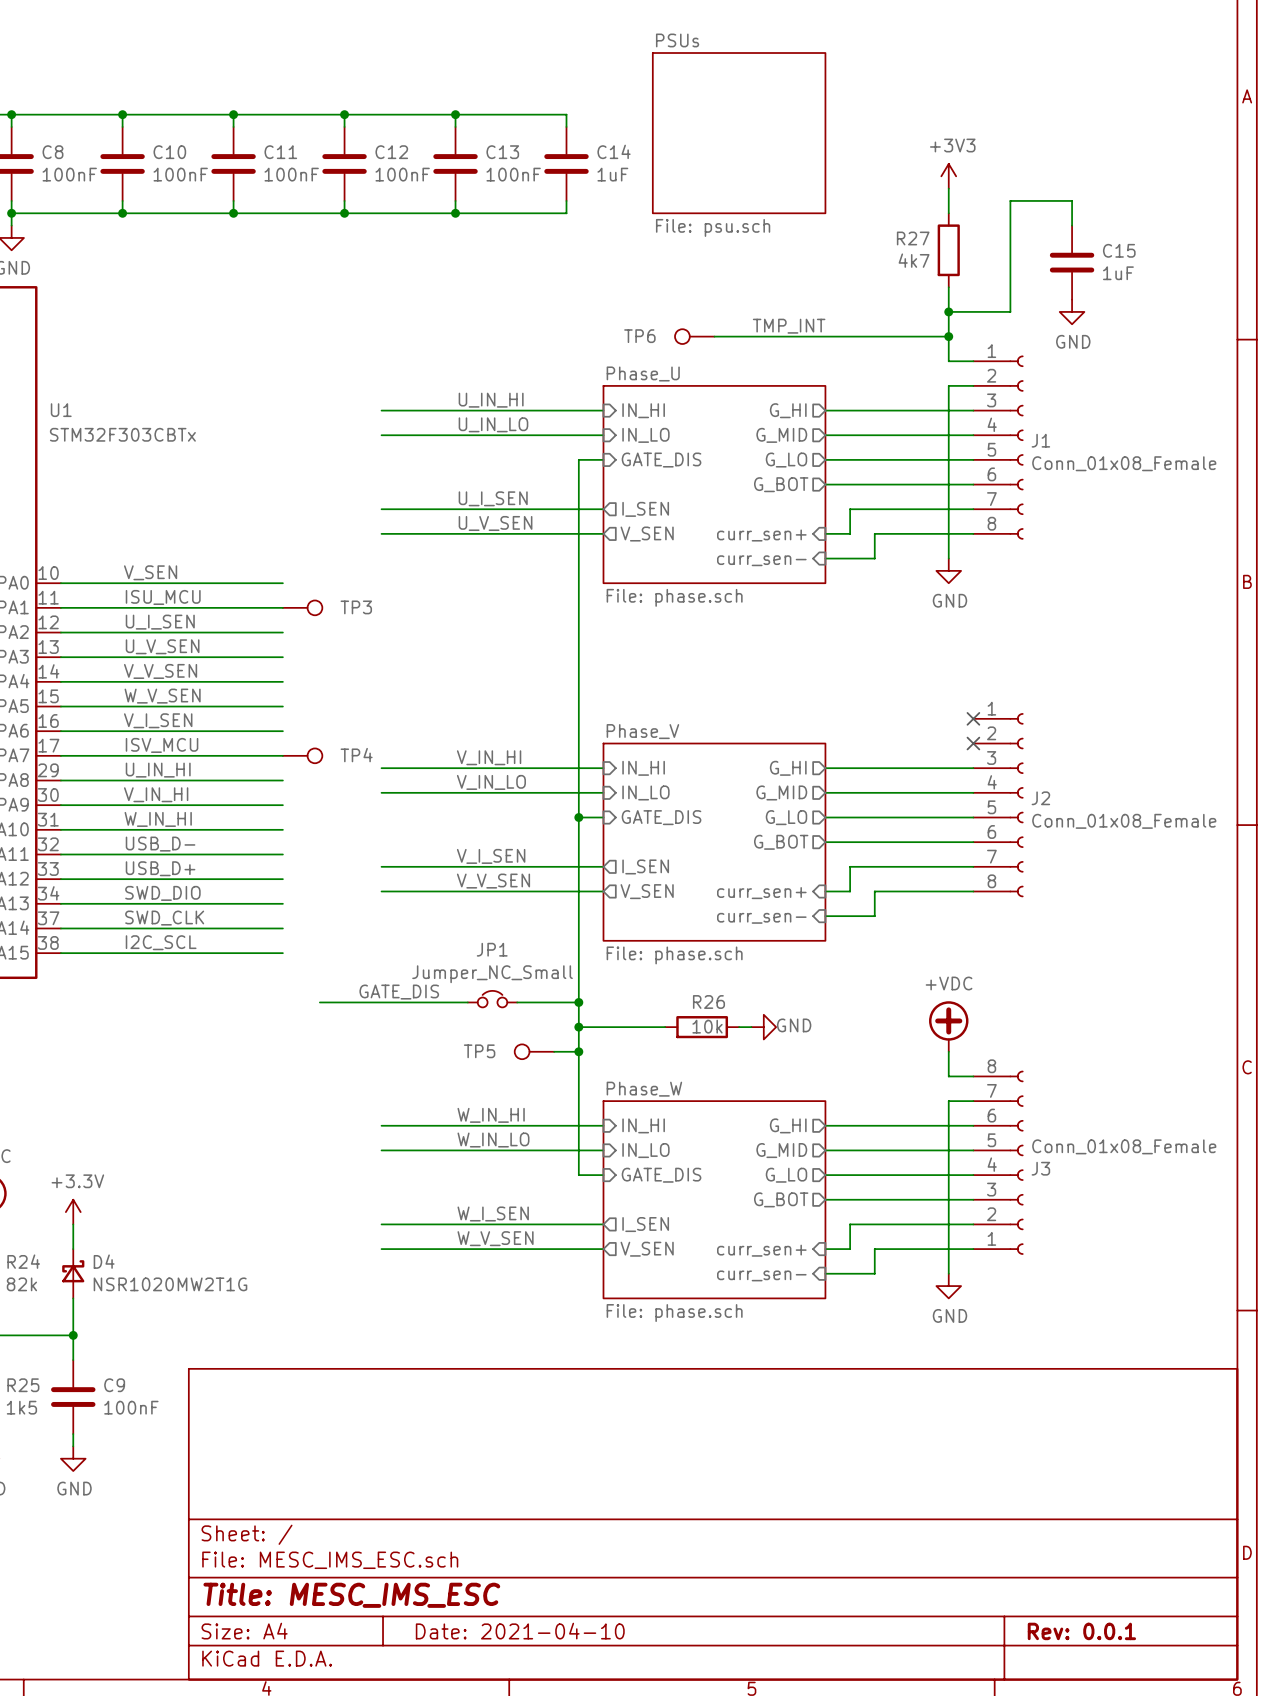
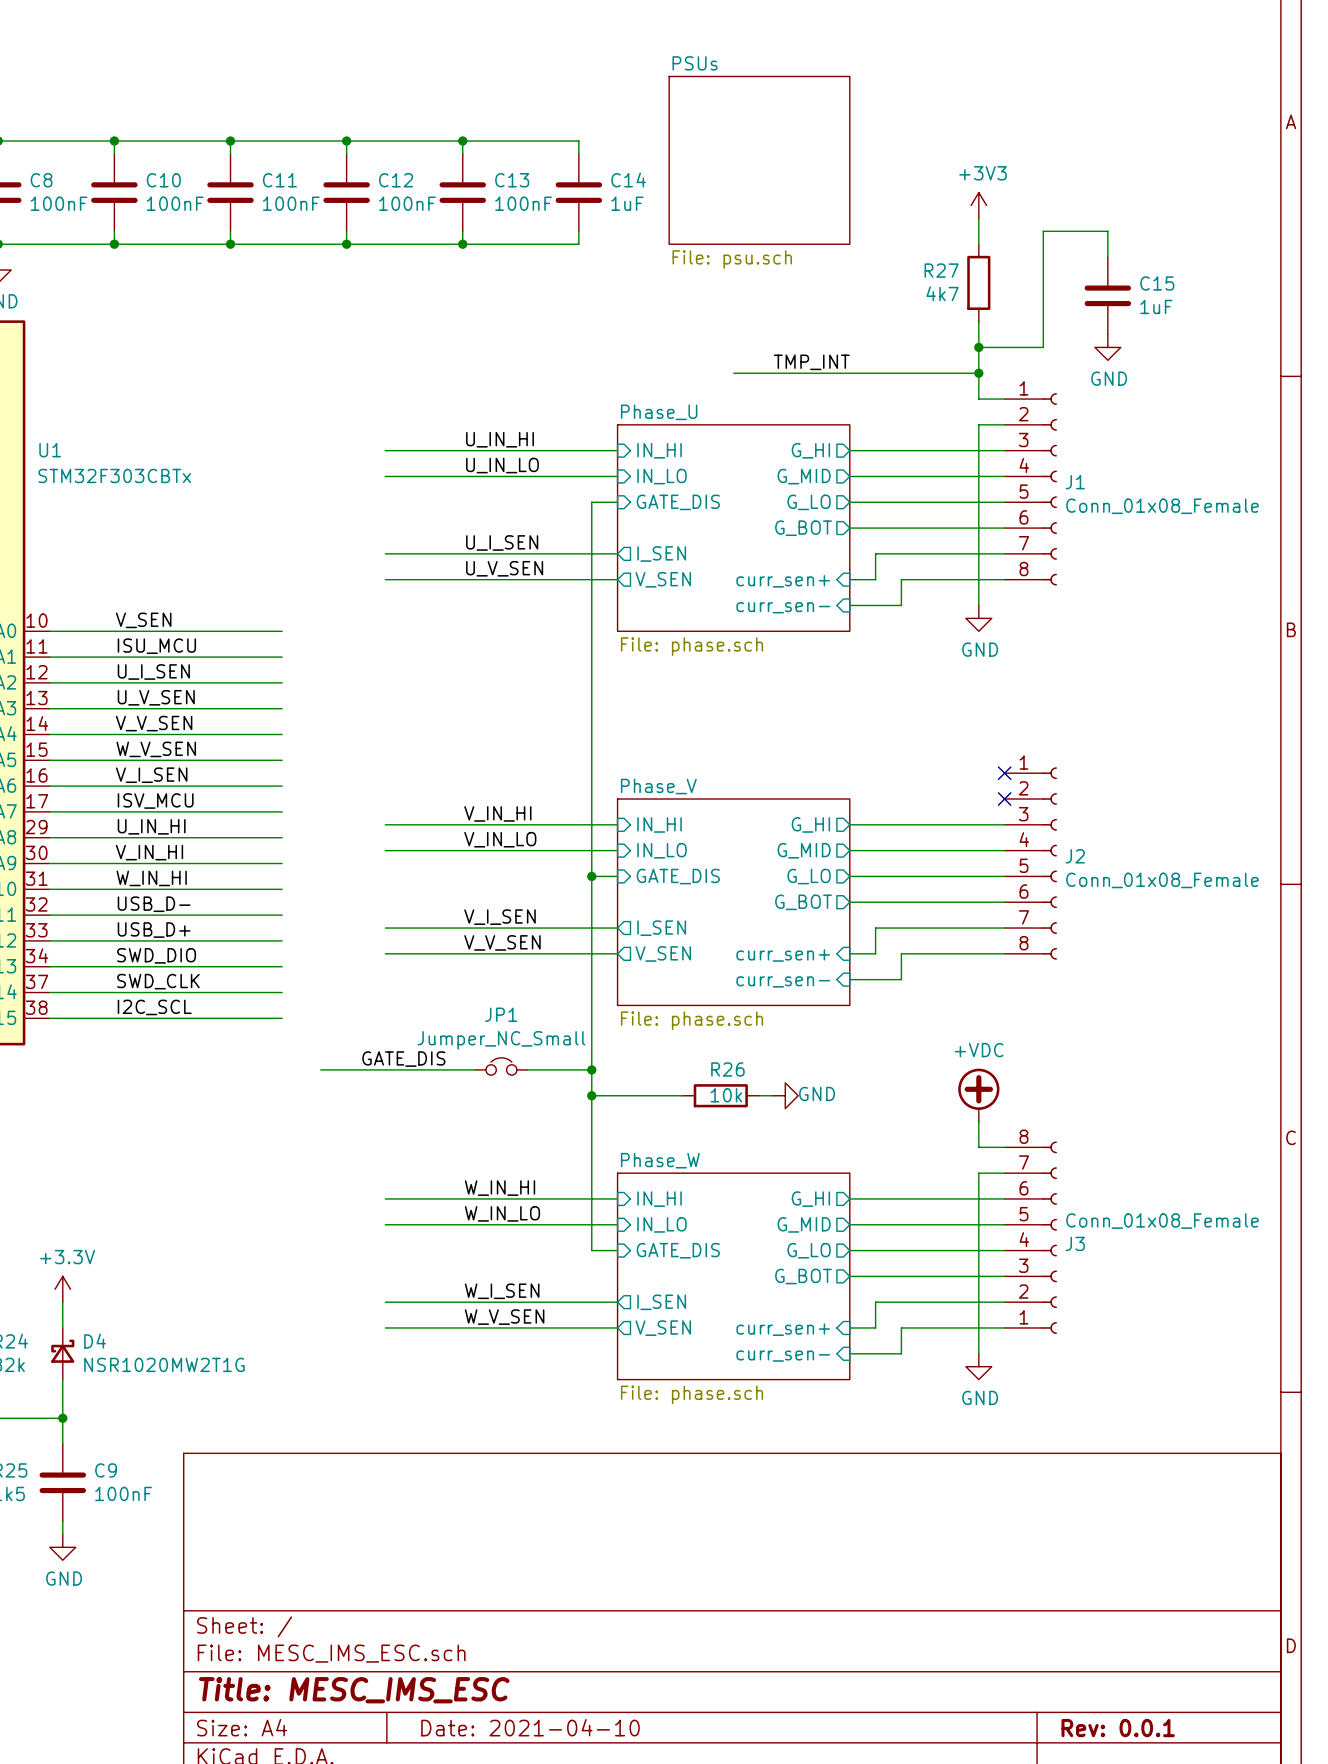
TP6: (694, 336) -> none
TP3: (302, 607) -> none
TP4: (302, 755) -> none
TP5: (534, 1051) -> none
wire: (554, 1051) (578, 1051) -> none
junction: (578, 1051) -> none

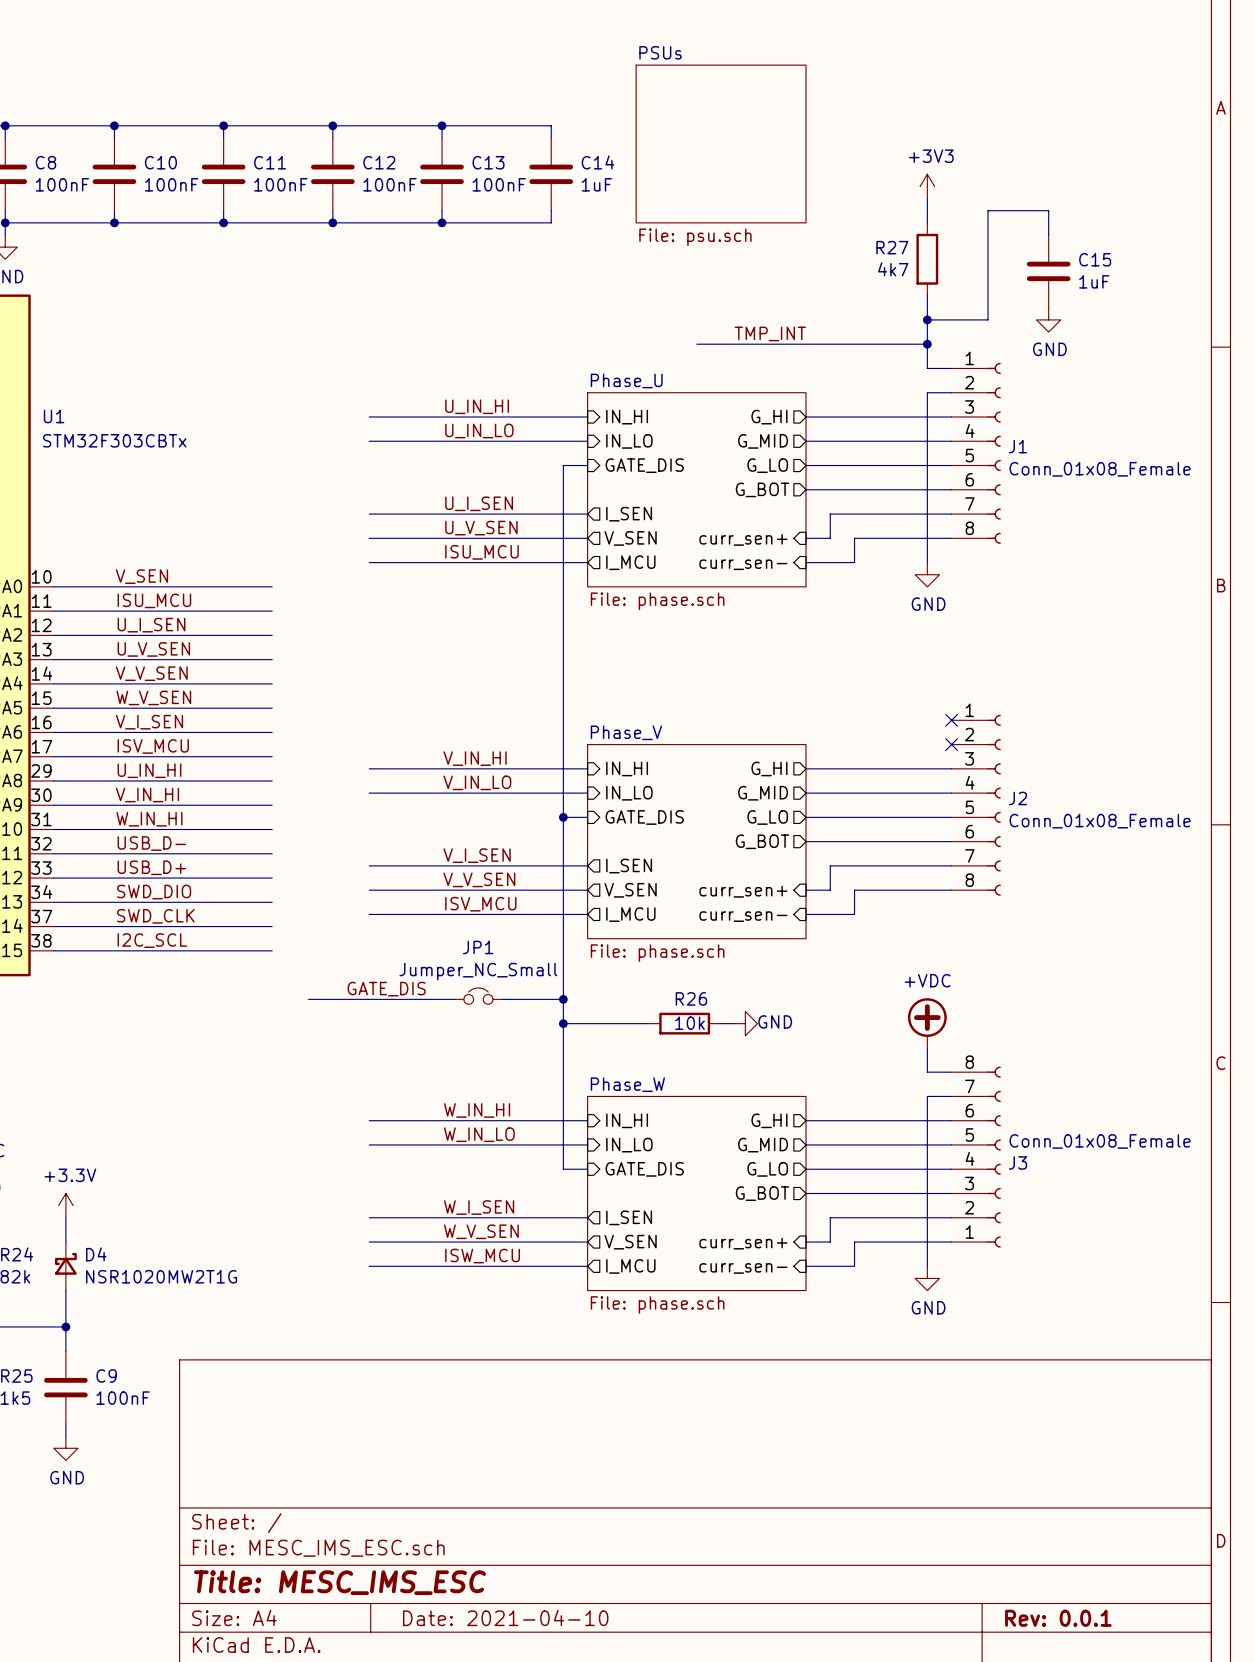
label: none -> ISU_MCU (481, 552)
wire: none -> (369, 562) (587, 562)
sheet pin: none -> I_MCU (630, 562)
label: none -> ISV_MCU (480, 904)
wire: none -> (369, 914) (587, 914)
sheet pin: none -> I_MCU (630, 914)
label: none -> ISW_MCU (482, 1256)
wire: none -> (369, 1266) (587, 1266)
sheet pin: none -> I_MCU (630, 1266)

